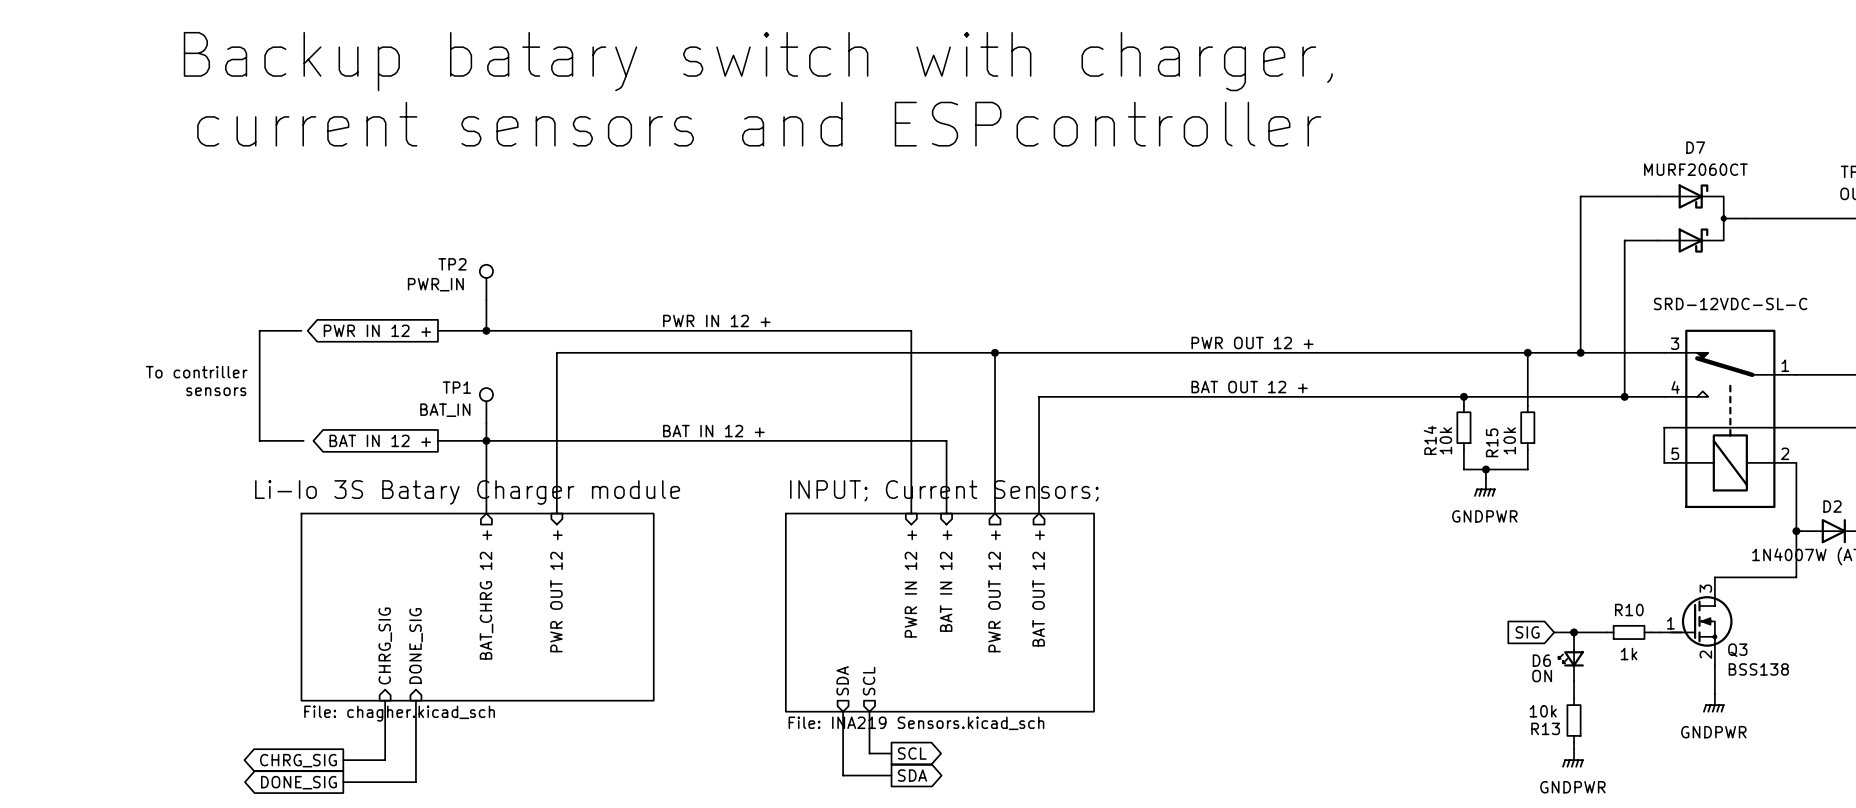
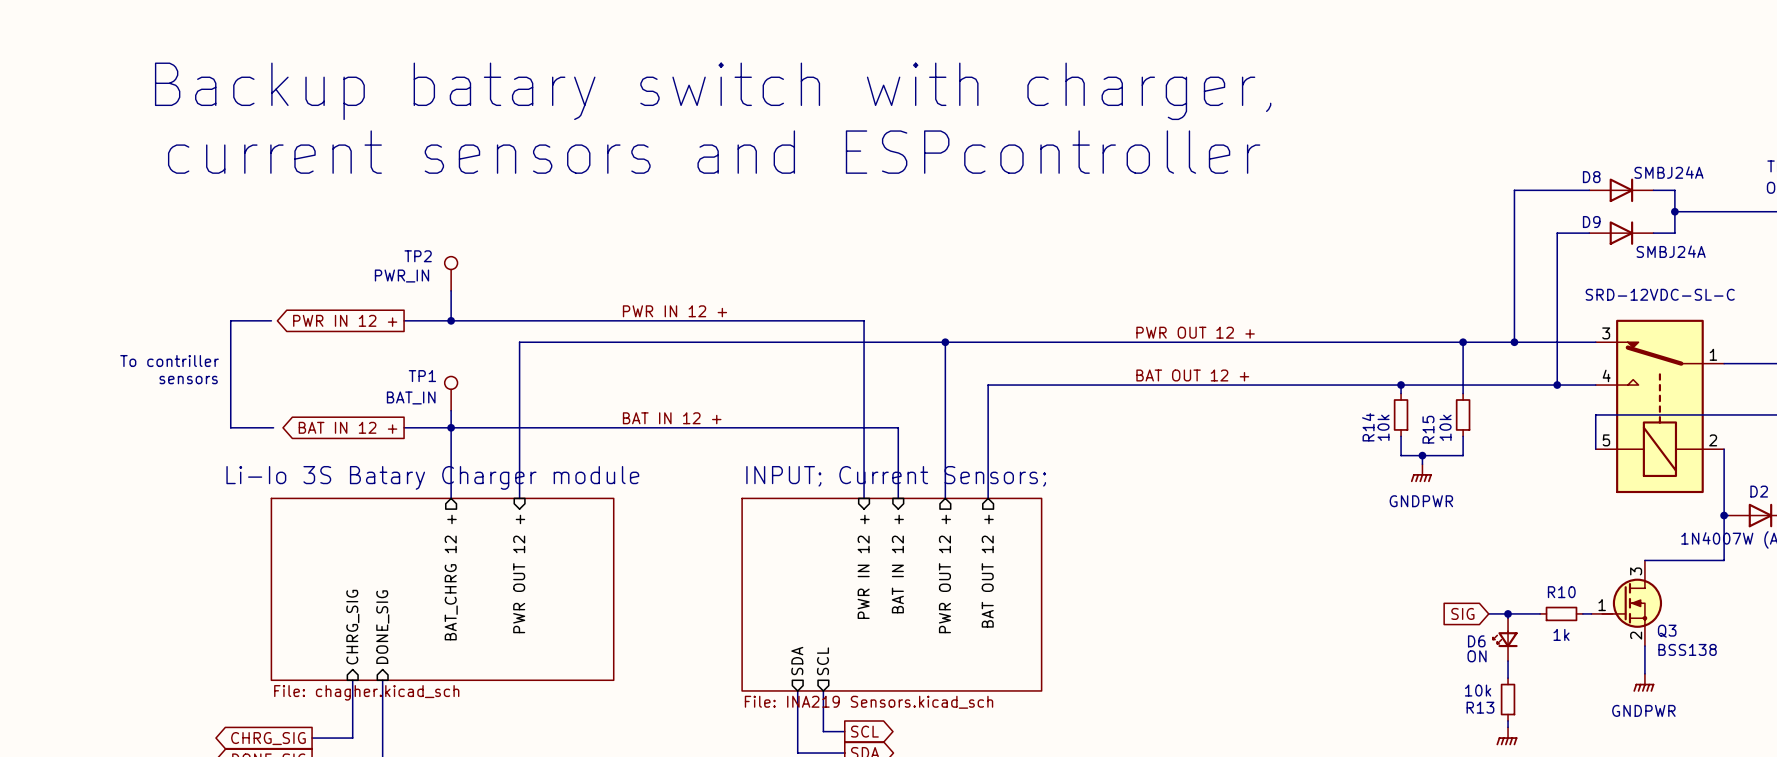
text position: Backup batary switch with charger, (758, 61) -> Backup batary switch with charger, (713, 91)
text position: current sensors and ESPcontroller (759, 124) -> current sensors and ESPcontroller (714, 152)
D8: none -> SMBJ24A (1621, 190)
bus: none -> (1653, 190) (1674, 190) (1674, 233) (1653, 233)
D7: MURF2060CT (1701, 218) -> none
junction: none -> (1674, 211)
D9: none -> SMBJ24A (1621, 233)

